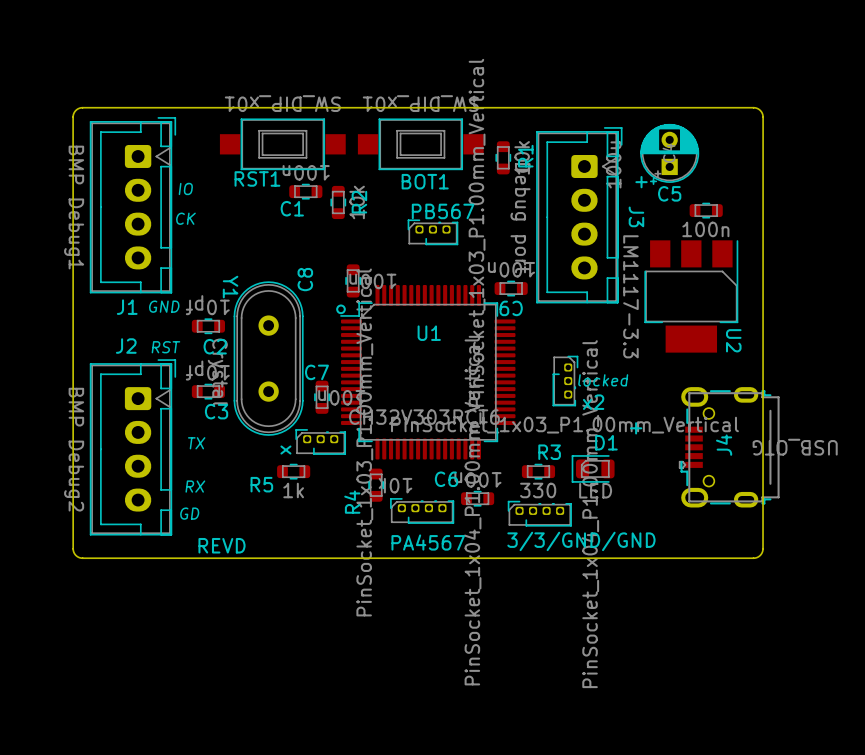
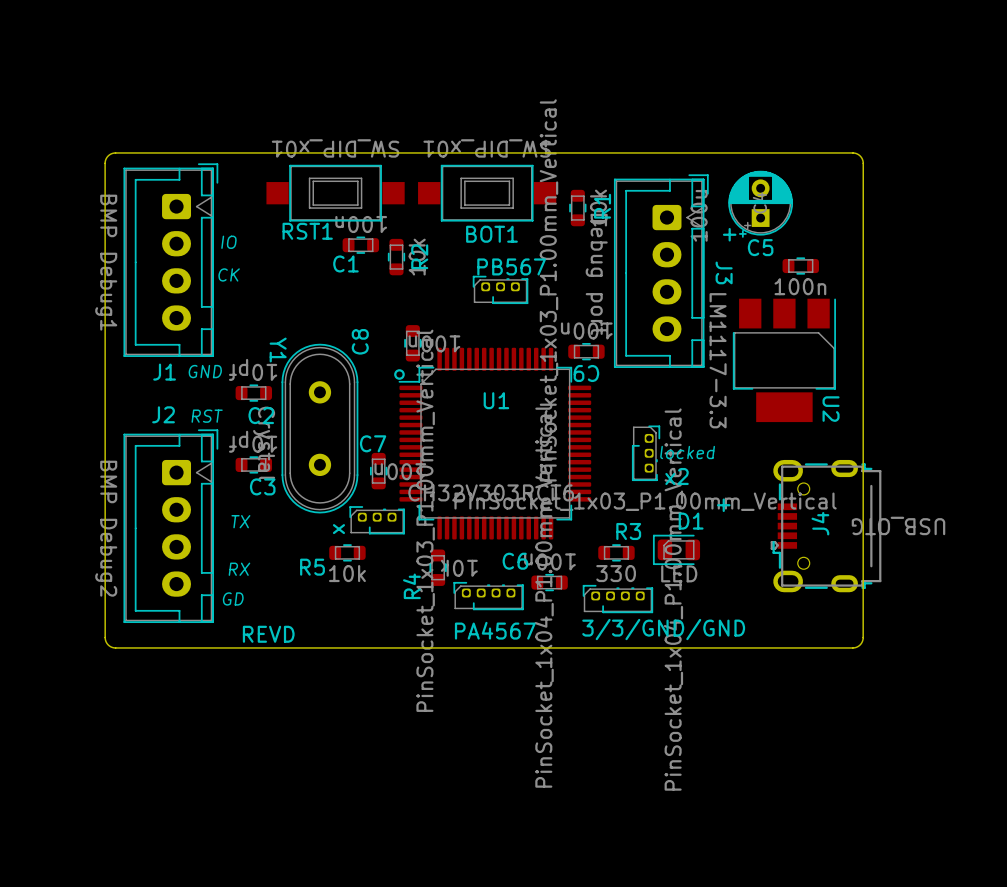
R5 value: 1k (293, 490) -> 10k (347, 573)

